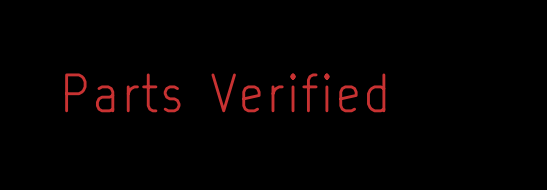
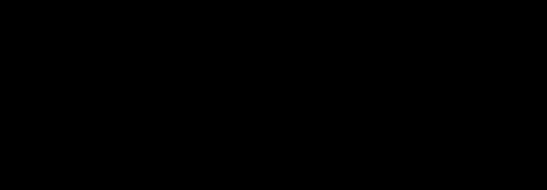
text: Parts Verified (225, 92) -> none

